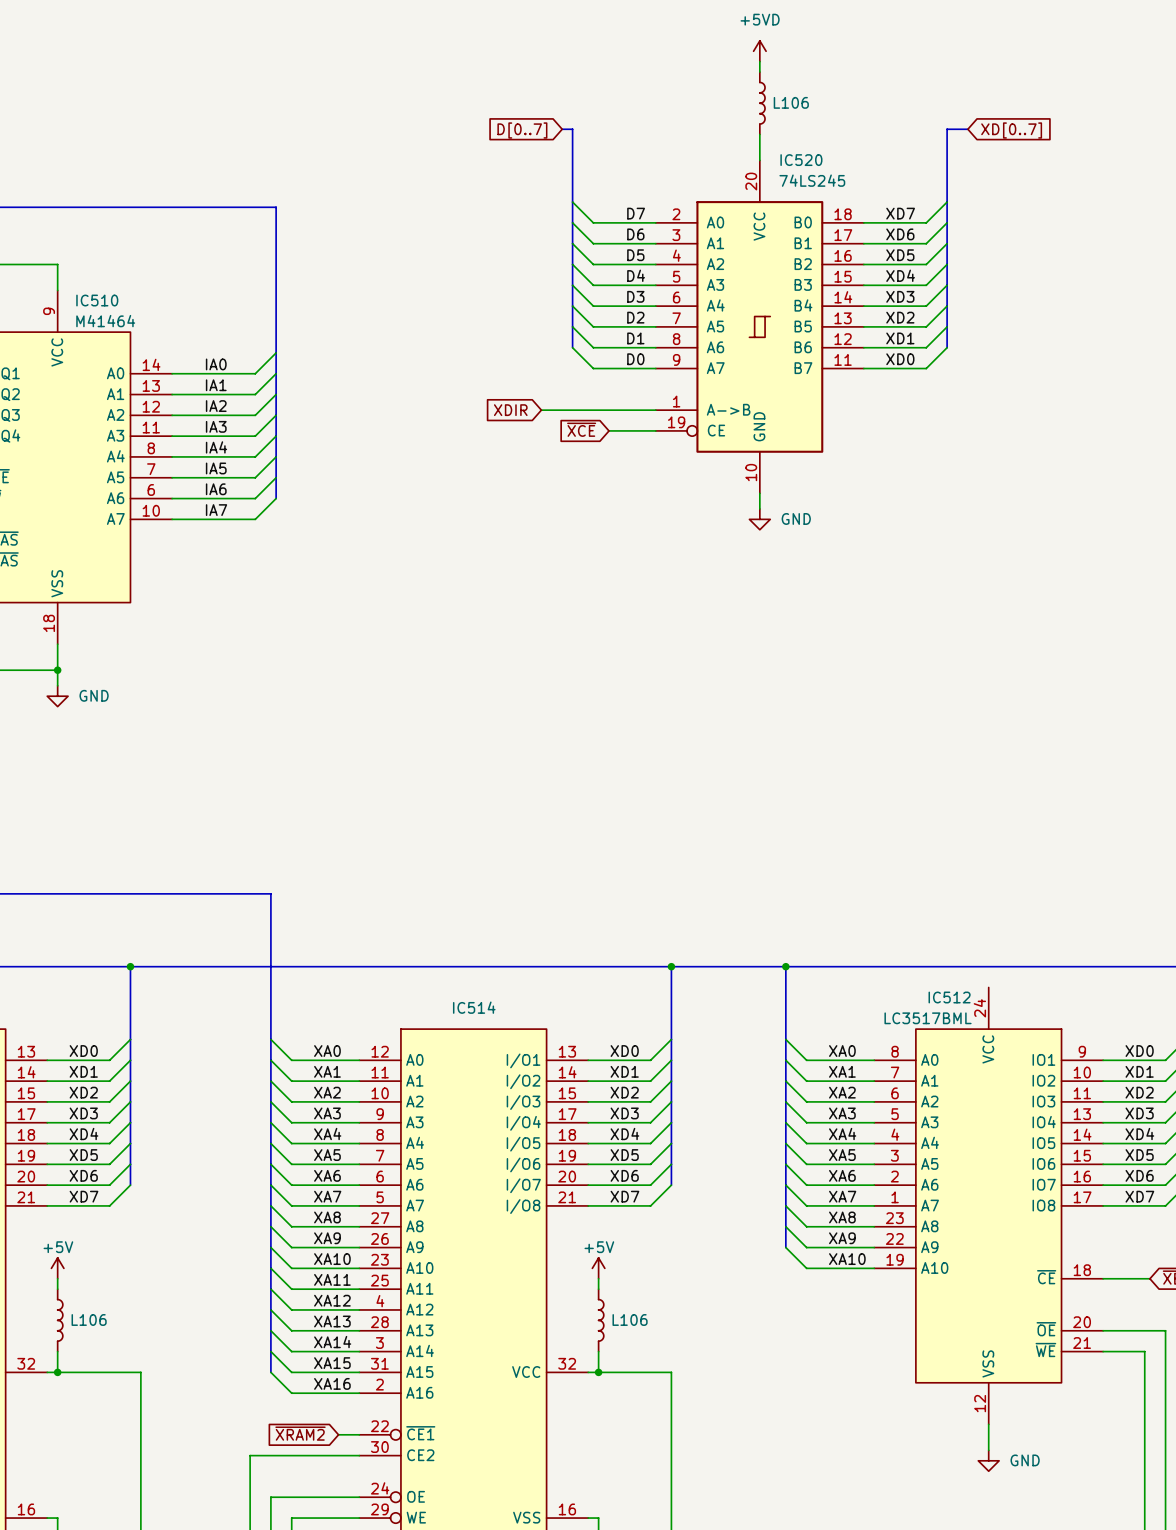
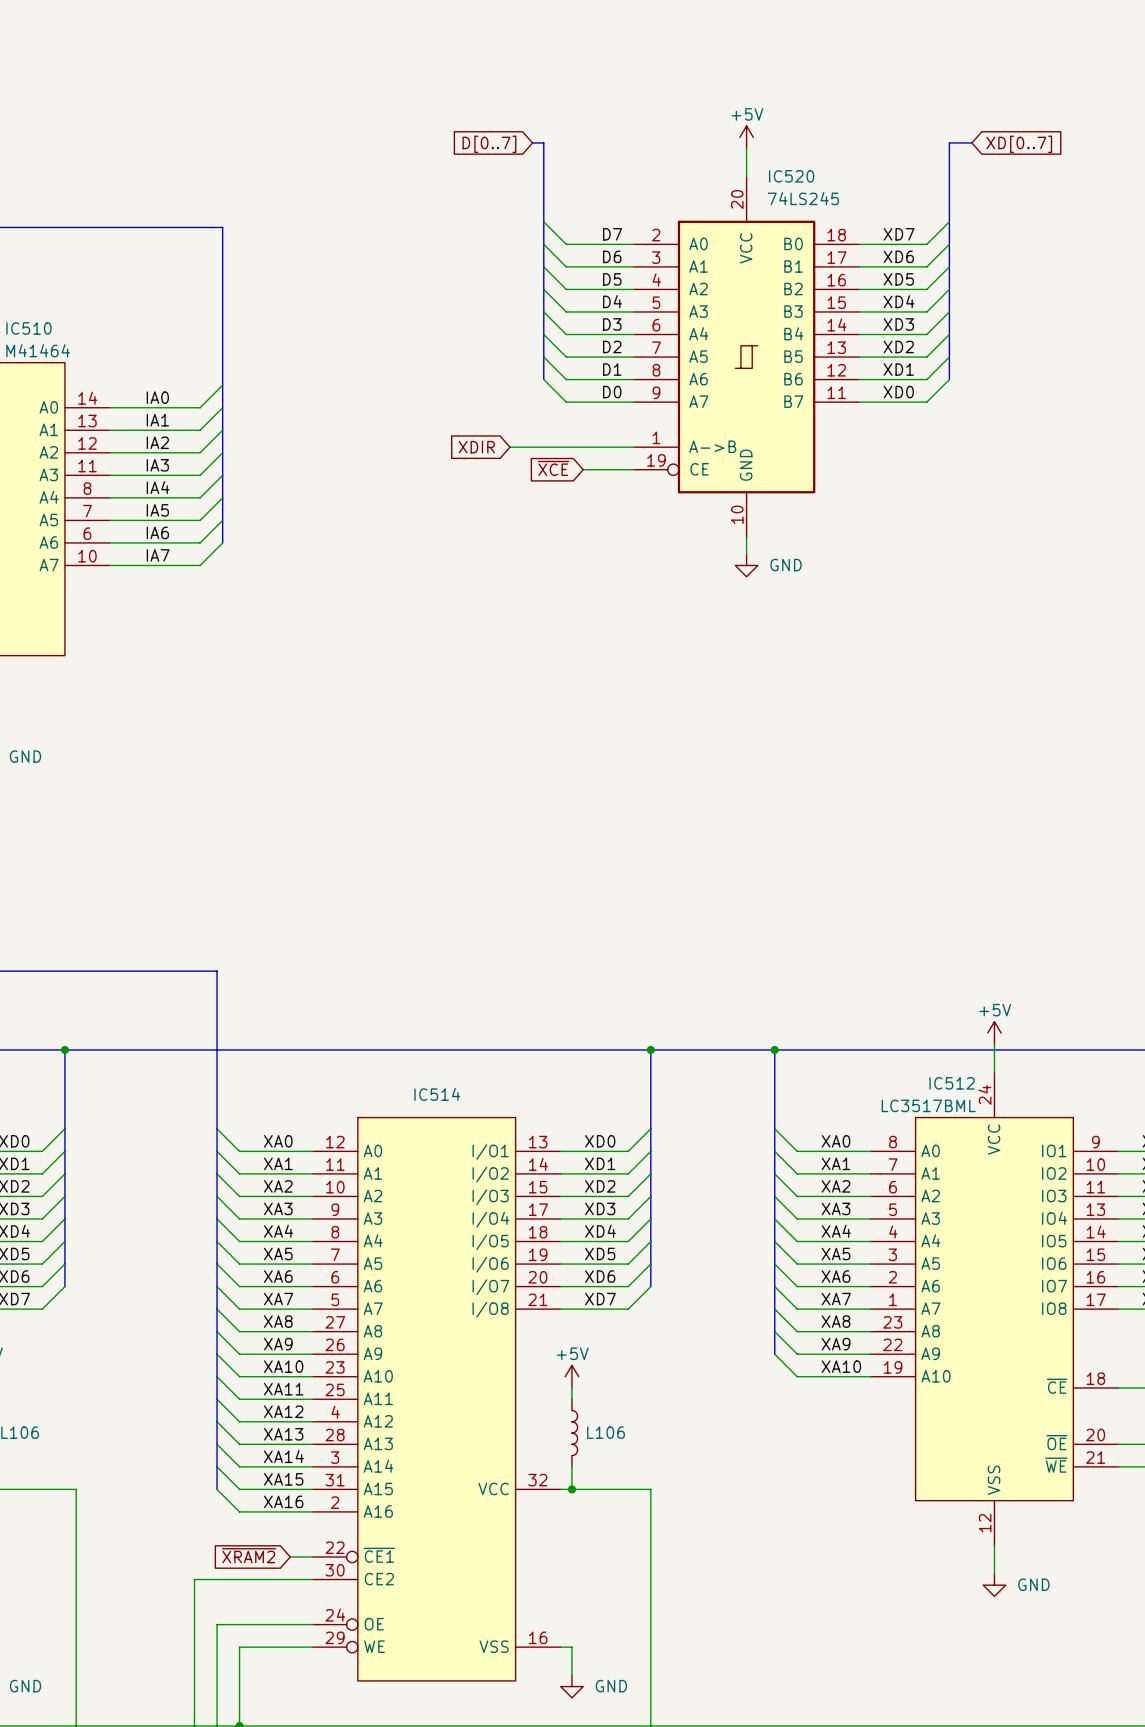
power symbol: +5VD (759, 51) -> none
wire: (759, 61) (759, 72) -> none
L106: (762, 103) -> none
power symbol: none -> +5V (746, 137)
power symbol: none -> +5V (994, 1033)
wire: none -> (994, 1044) (994, 1072)

